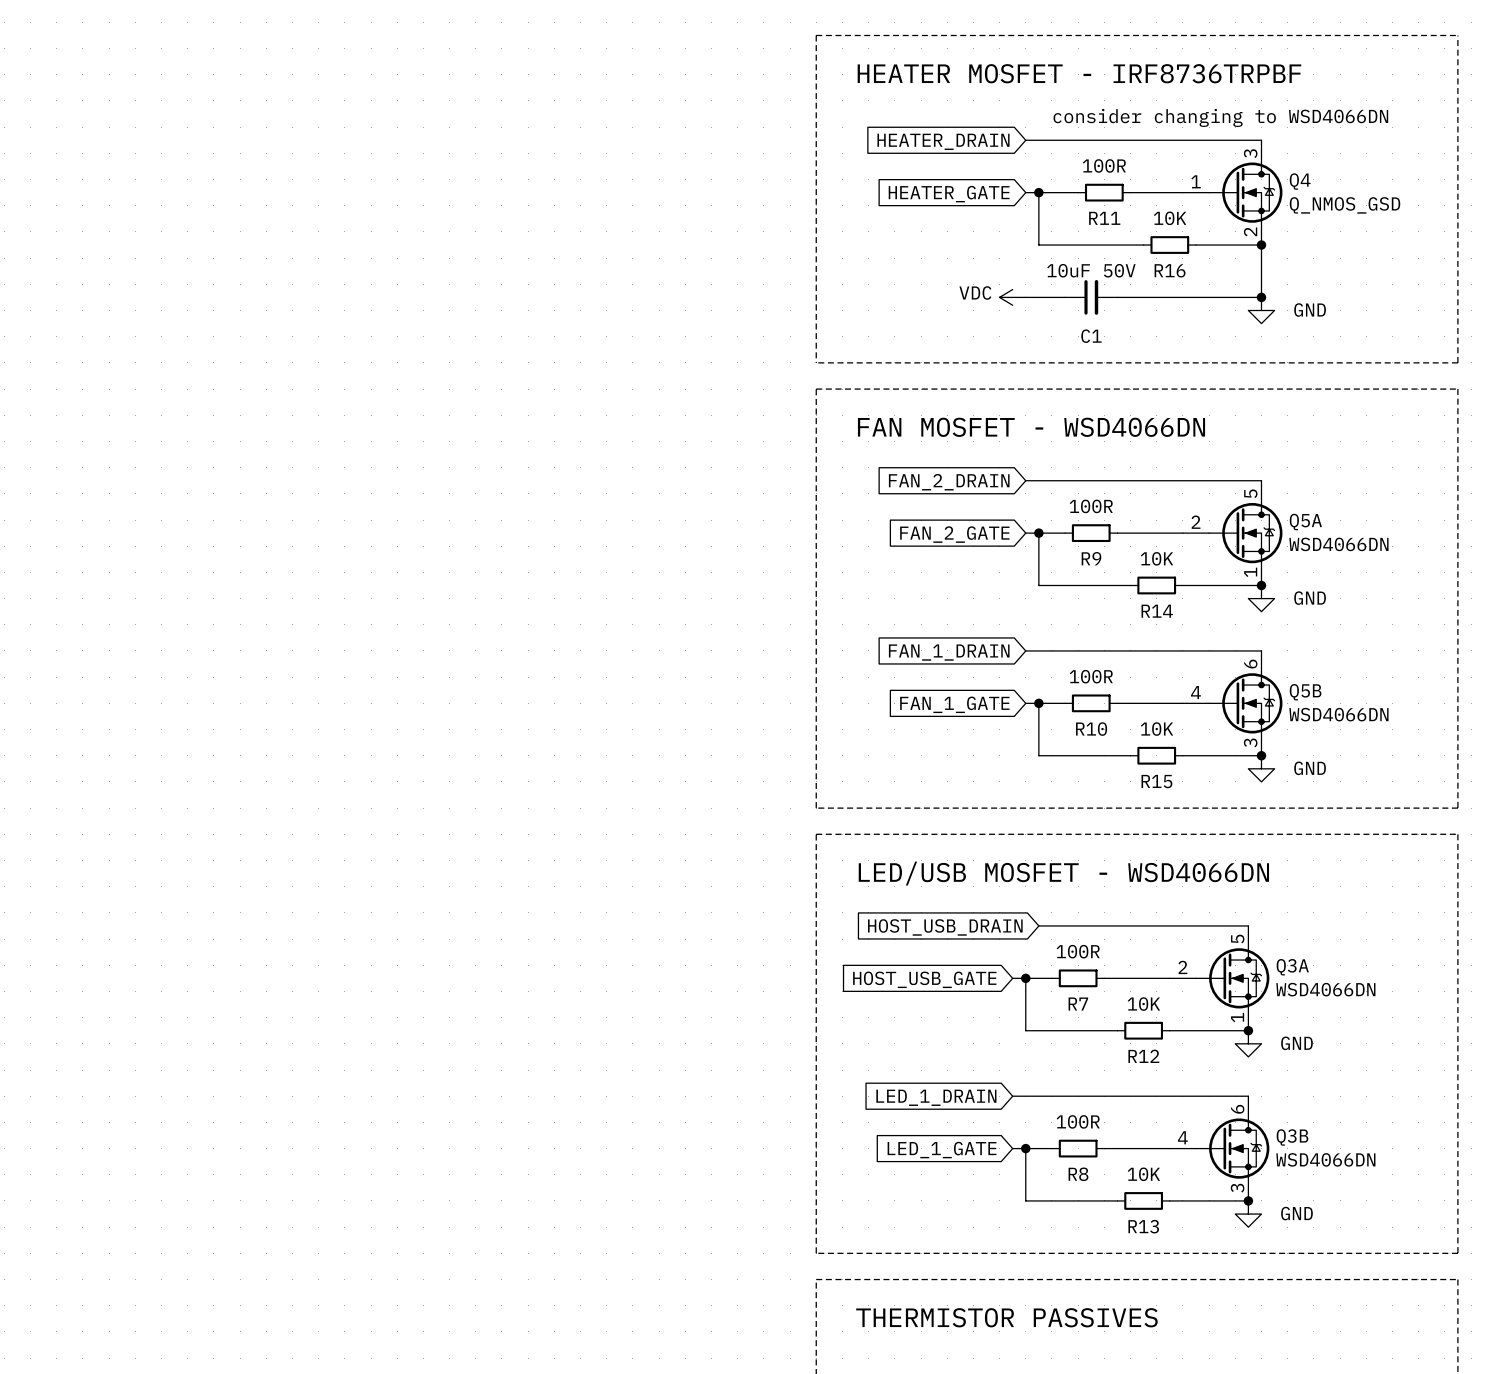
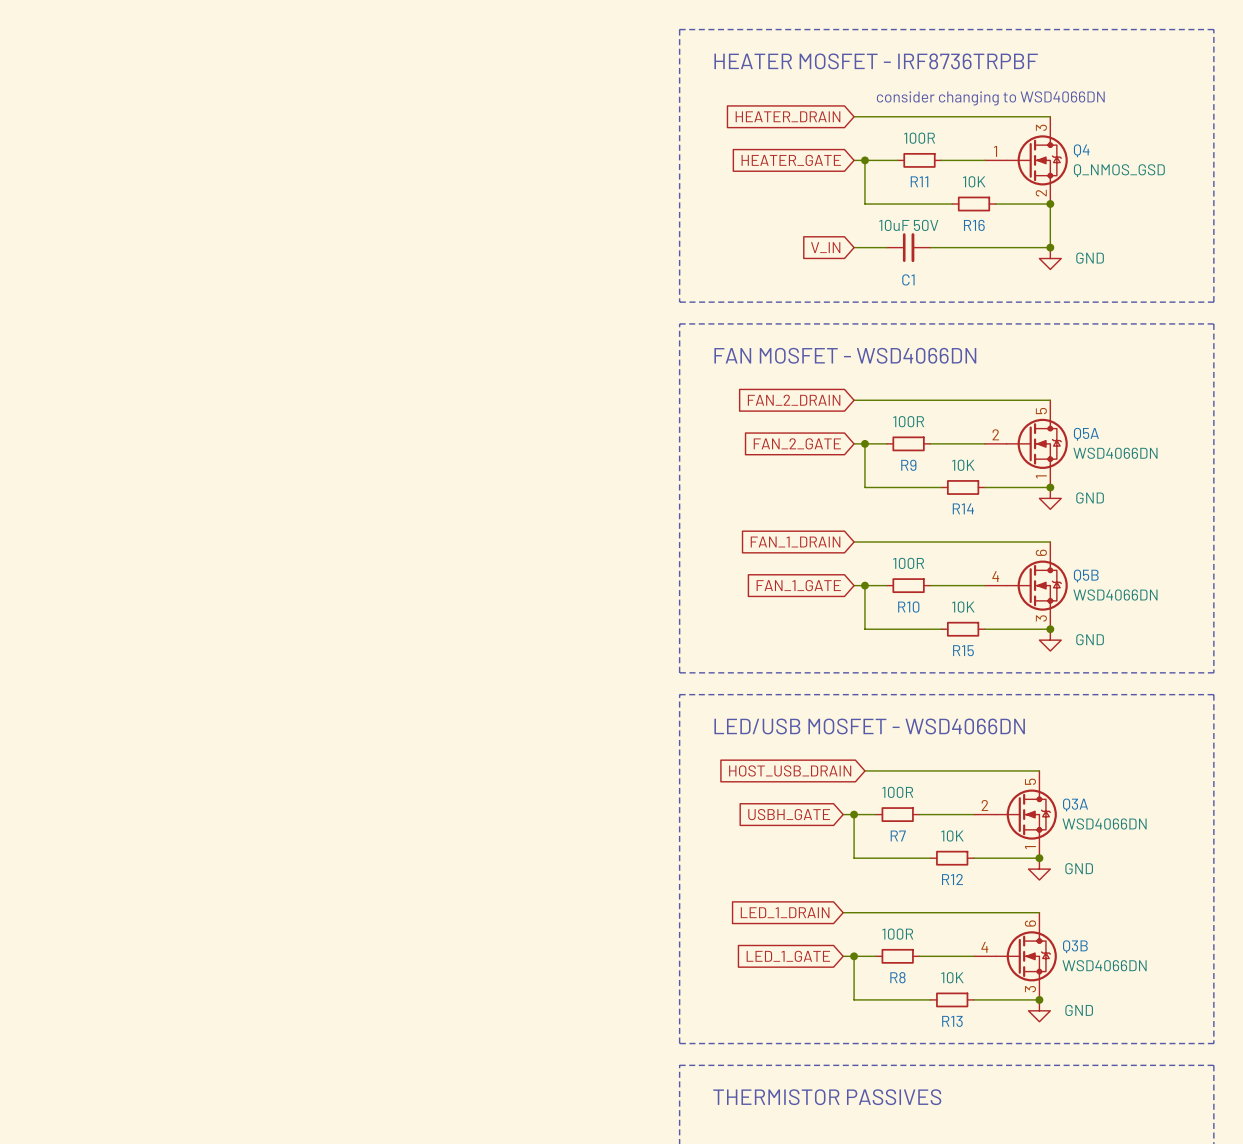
power symbol: VDC (1012, 297) -> none
global label: none -> V_IN (825, 247)
global label: HOST_USB_GATE (924, 979) -> USBH_GATE (789, 814)

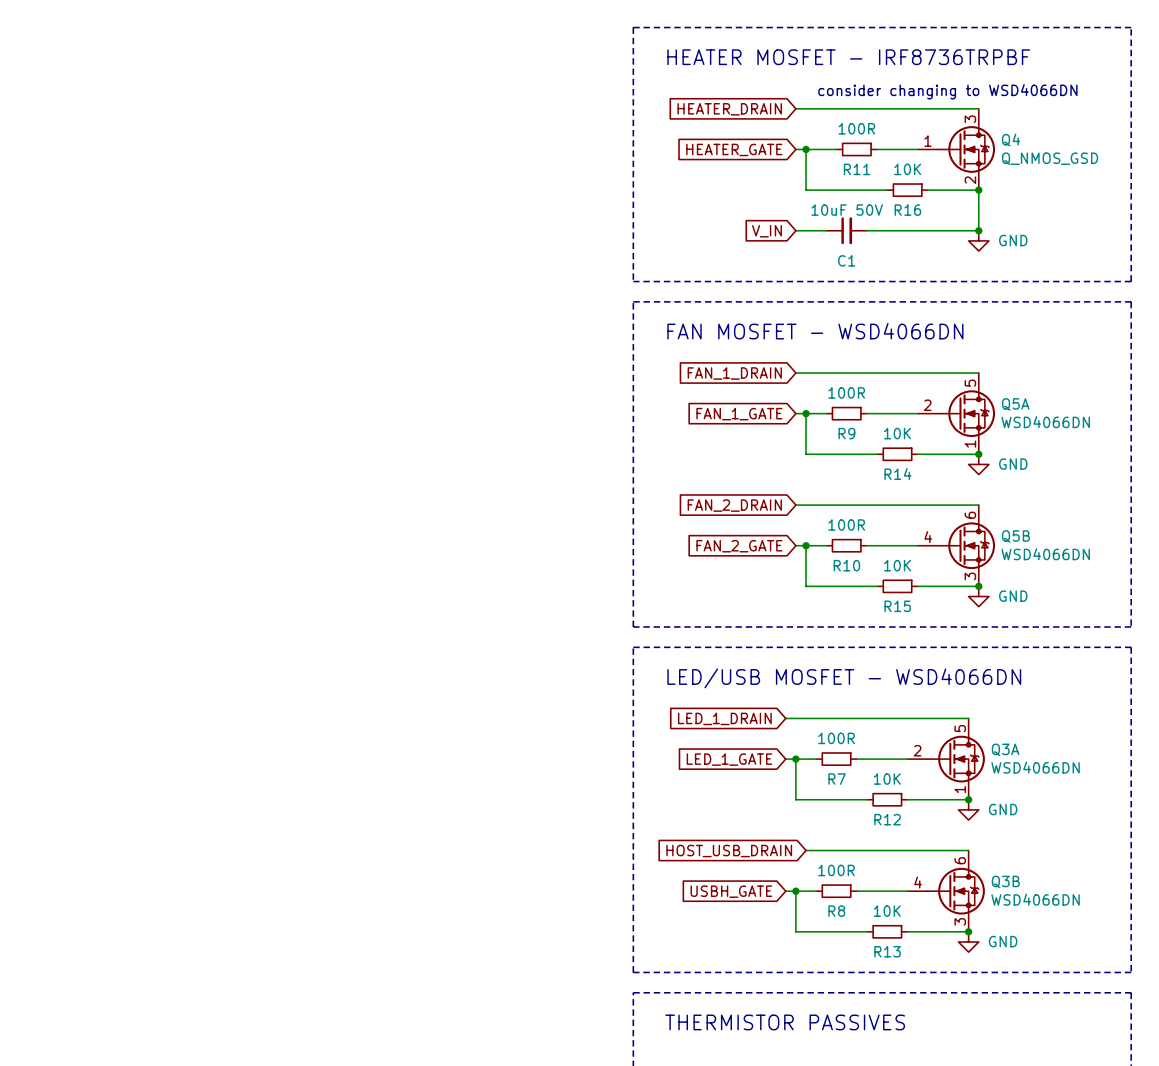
global label: FAN_2_DRAIN (794, 400) -> FAN_1_DRAIN (734, 373)
global label: FAN_2_GATE (797, 443) -> FAN_1_GATE (739, 414)
global label: FAN_1_DRAIN (795, 542) -> FAN_2_DRAIN (734, 505)
global label: FAN_1_GATE (798, 585) -> FAN_2_GATE (739, 546)
global label position: HOST_USB_DRAIN (790, 770) -> HOST_USB_DRAIN (729, 851)
global label: USBH_GATE (789, 814) -> LED_1_GATE (729, 759)
global label position: LED_1_DRAIN (785, 912) -> LED_1_DRAIN (724, 718)
wire: (843, 912) (864, 912) -> (785, 718) (806, 718)
global label: LED_1_GATE (788, 956) -> USBH_GATE (731, 891)

